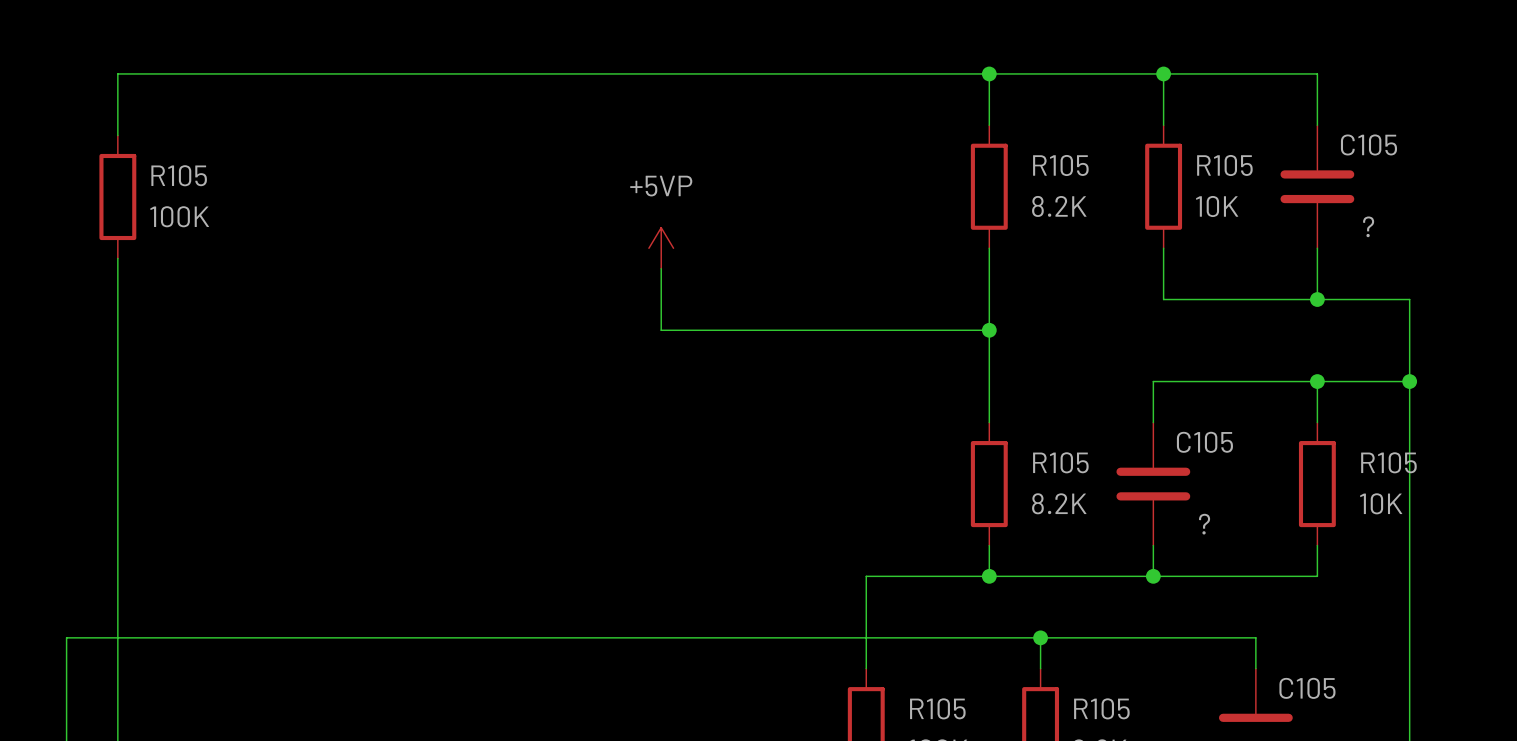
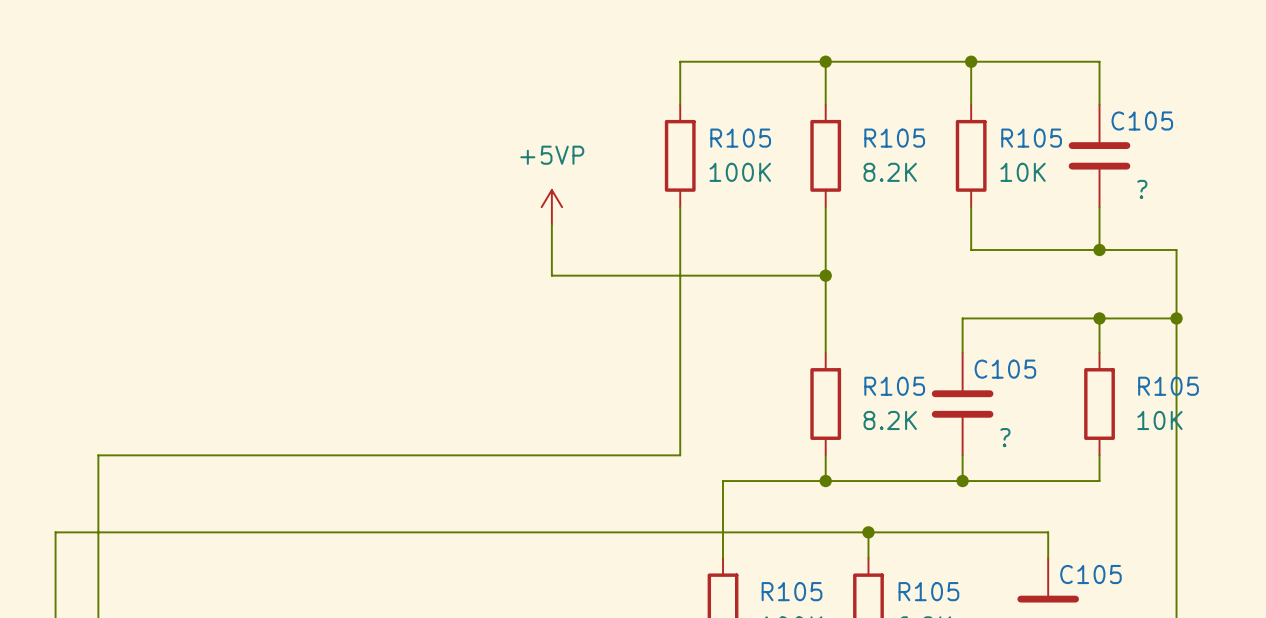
wire: (815, 73) (117, 73) (117, 135) -> (680, 61) (680, 104)
R105: none -> 100K (680, 155)
R105: 100K (117, 197) -> none
wire: (117, 258) (117, 545) -> (680, 207) (680, 455) (98, 455)

